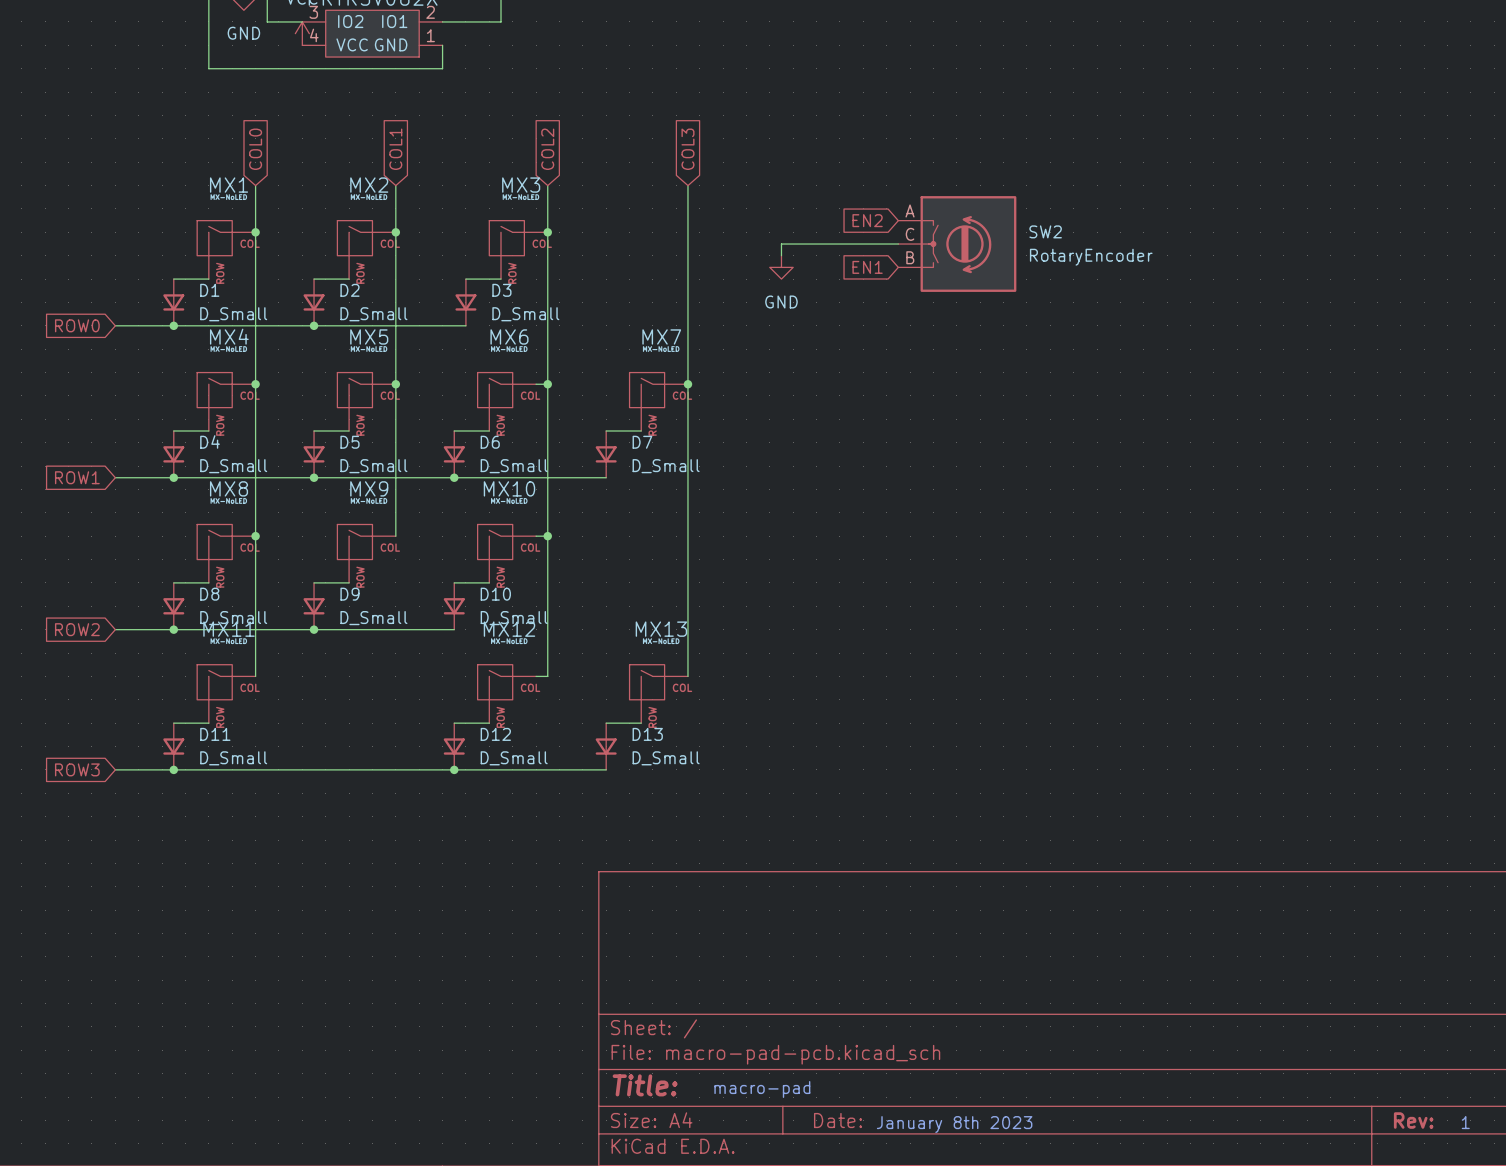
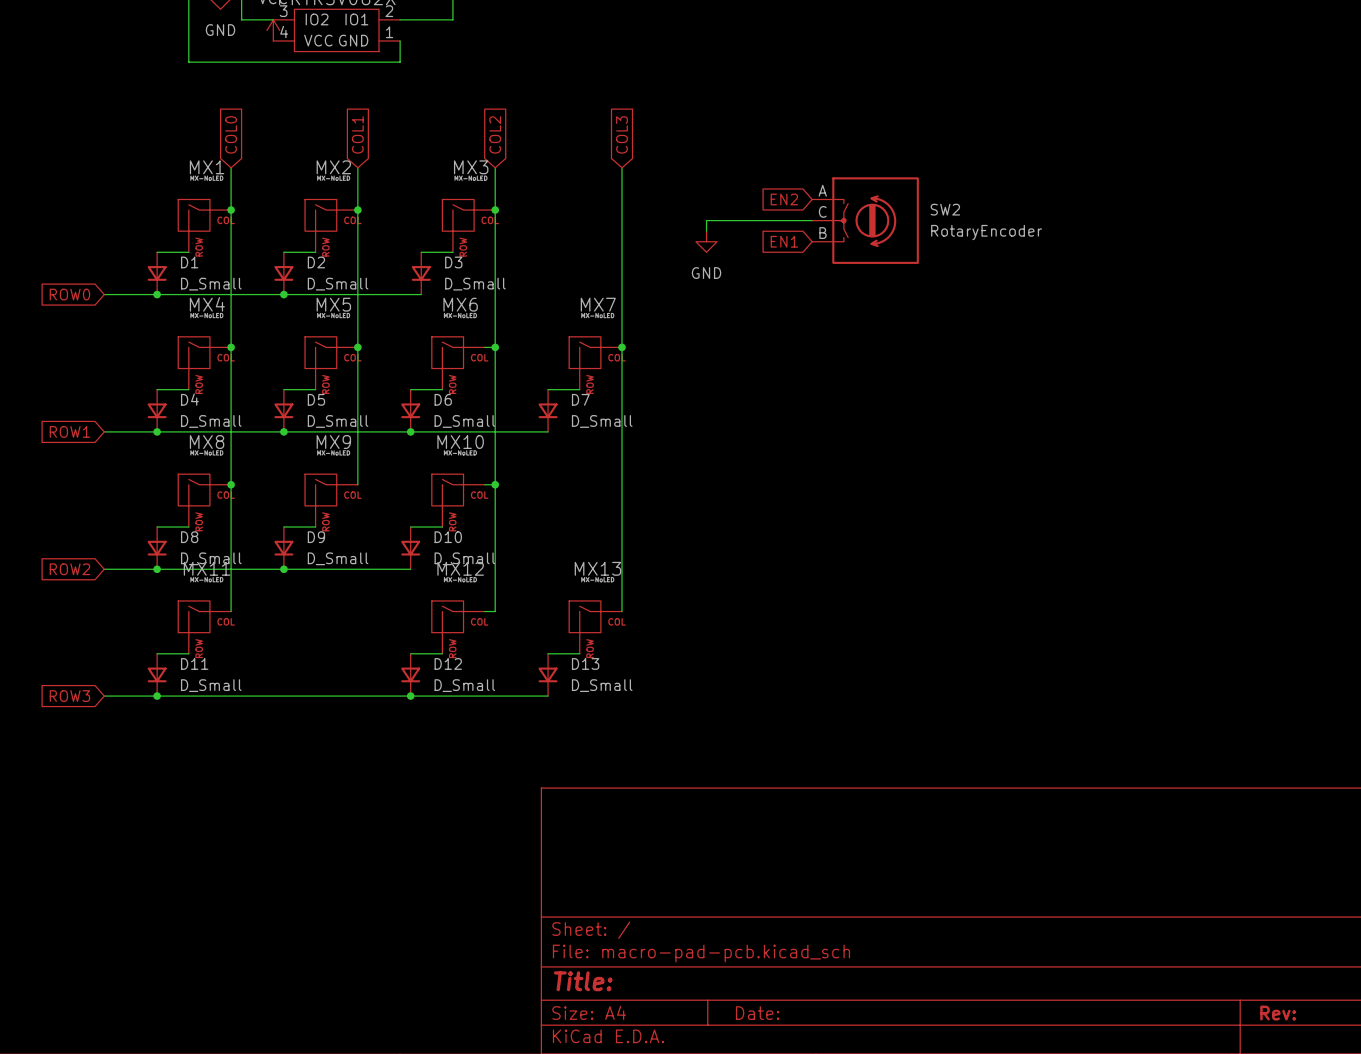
text: macro-pad (762, 1089) -> none
text: 1 (1465, 1122) -> none
text: January 8th 2023 (954, 1124) -> none

